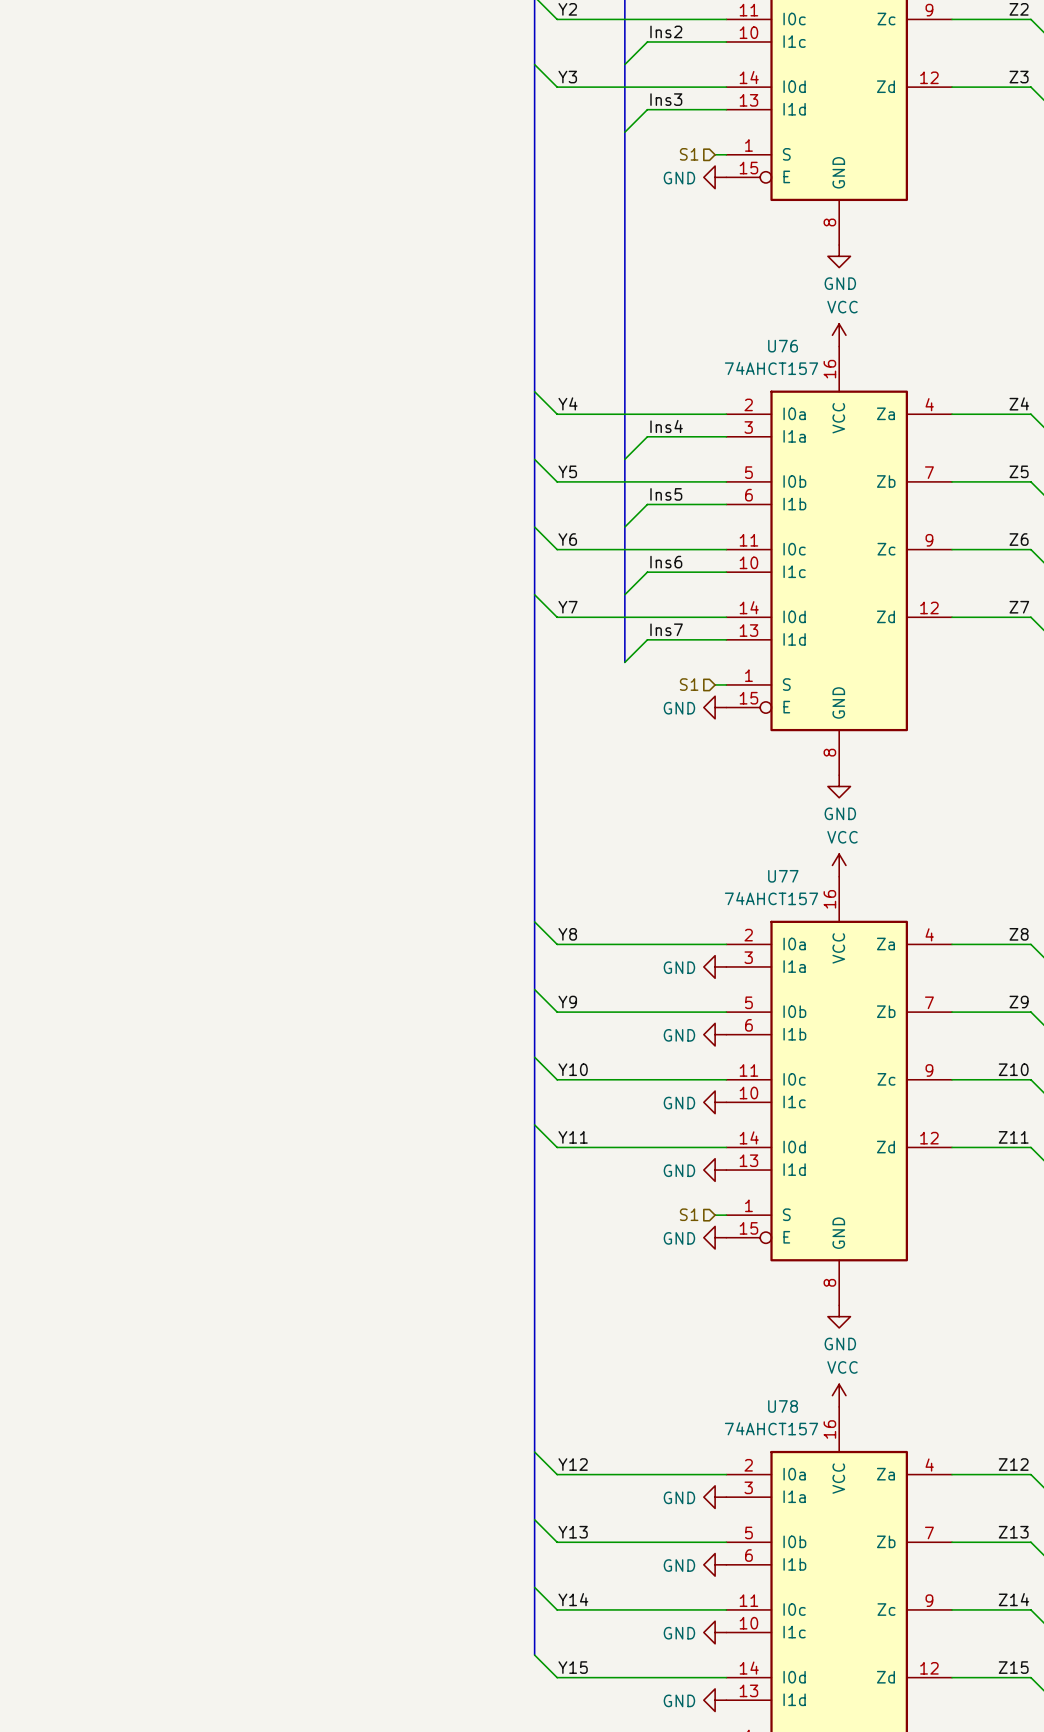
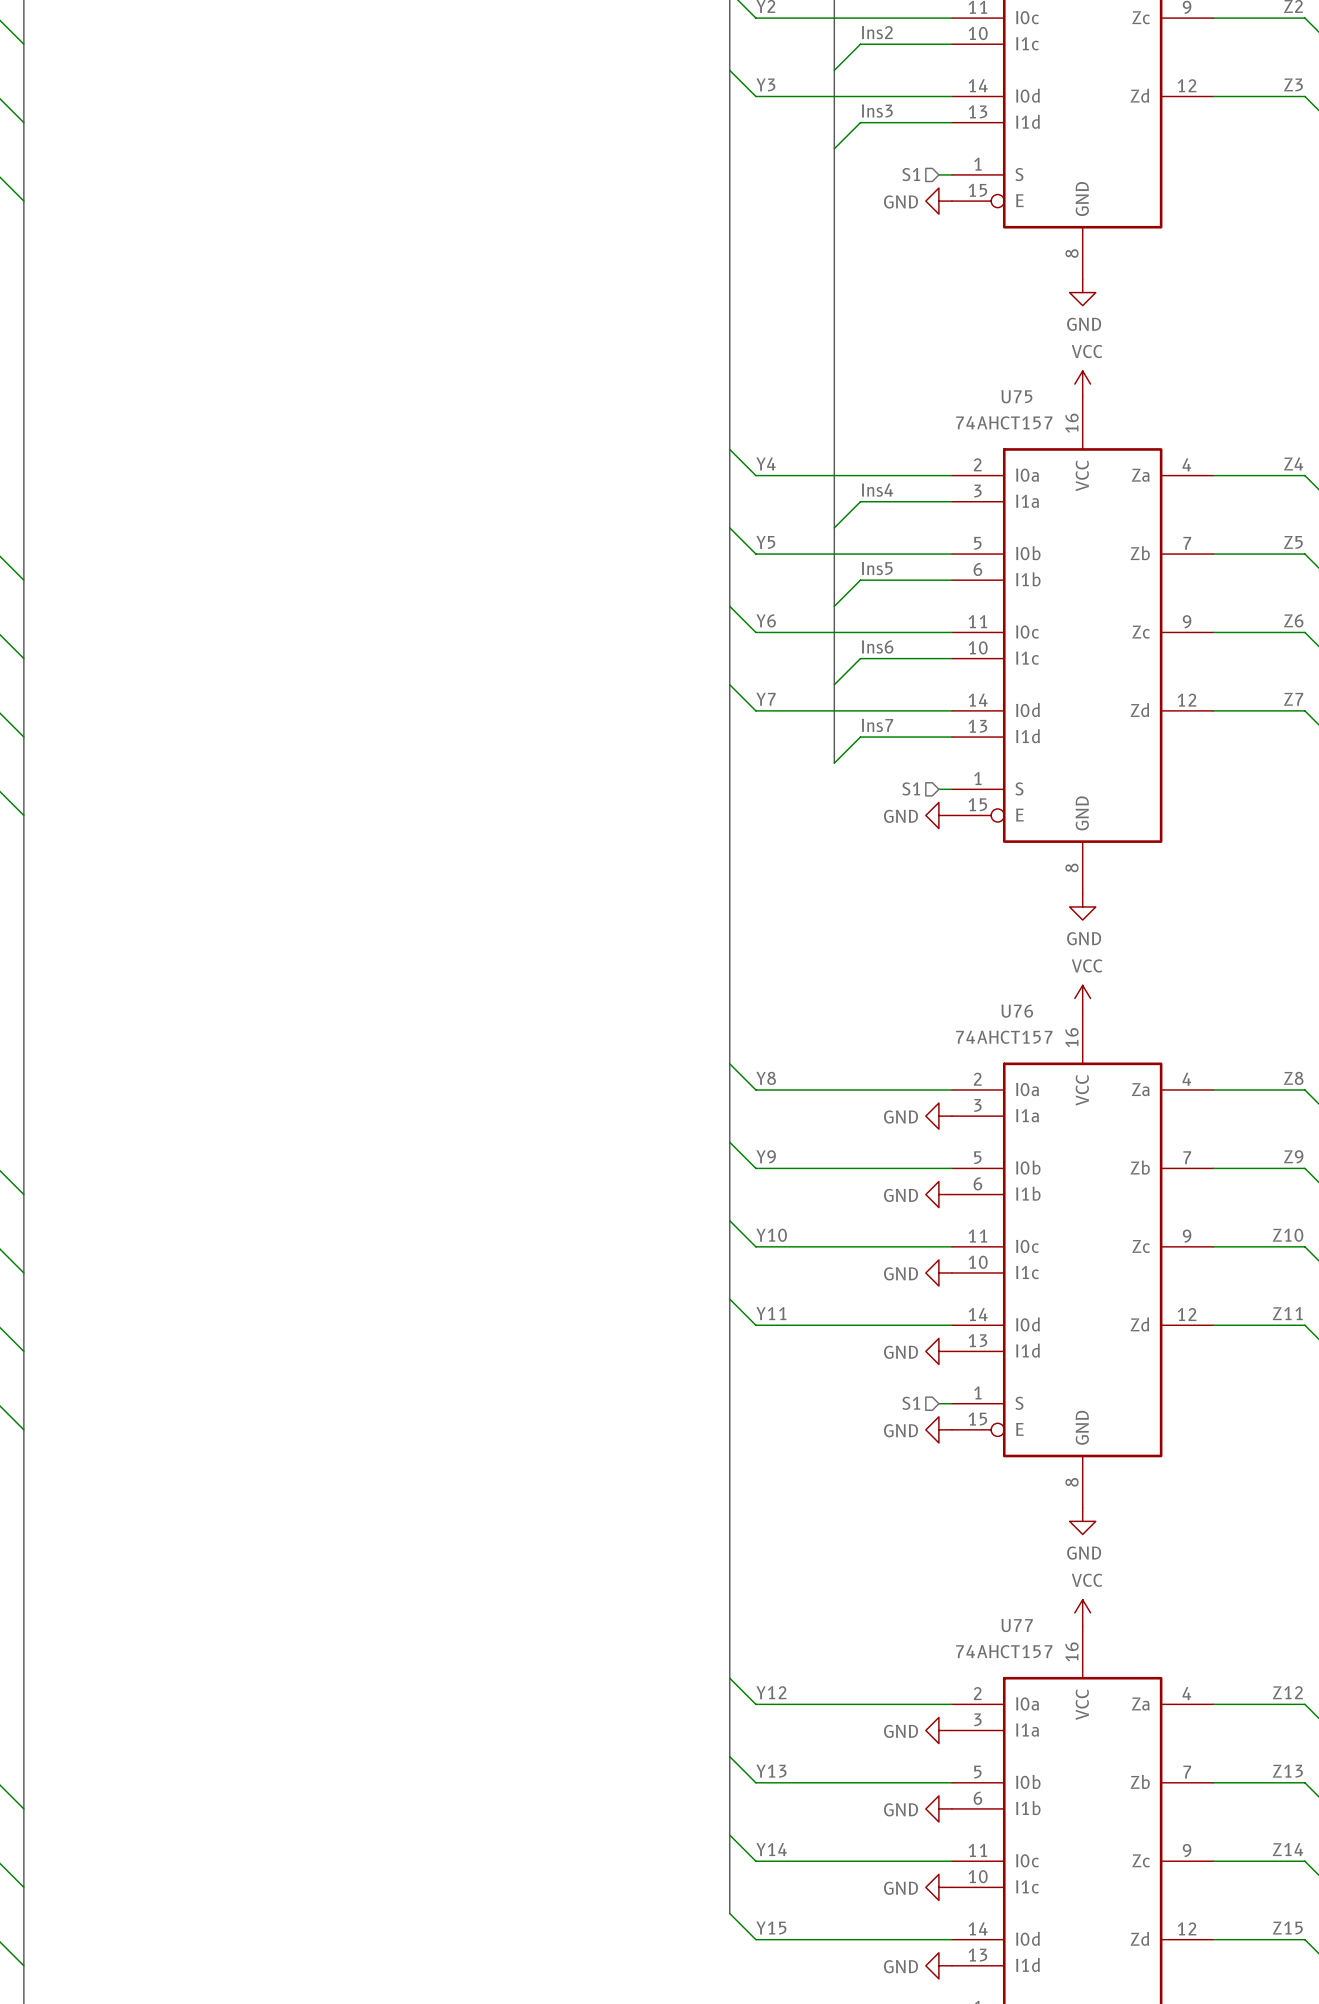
U76 name: U76 (783, 346) -> U75 (1016, 396)
U77 name: U77 (783, 876) -> U76 (1017, 1011)
U78 name: U78 (783, 1406) -> U77 (1017, 1625)

